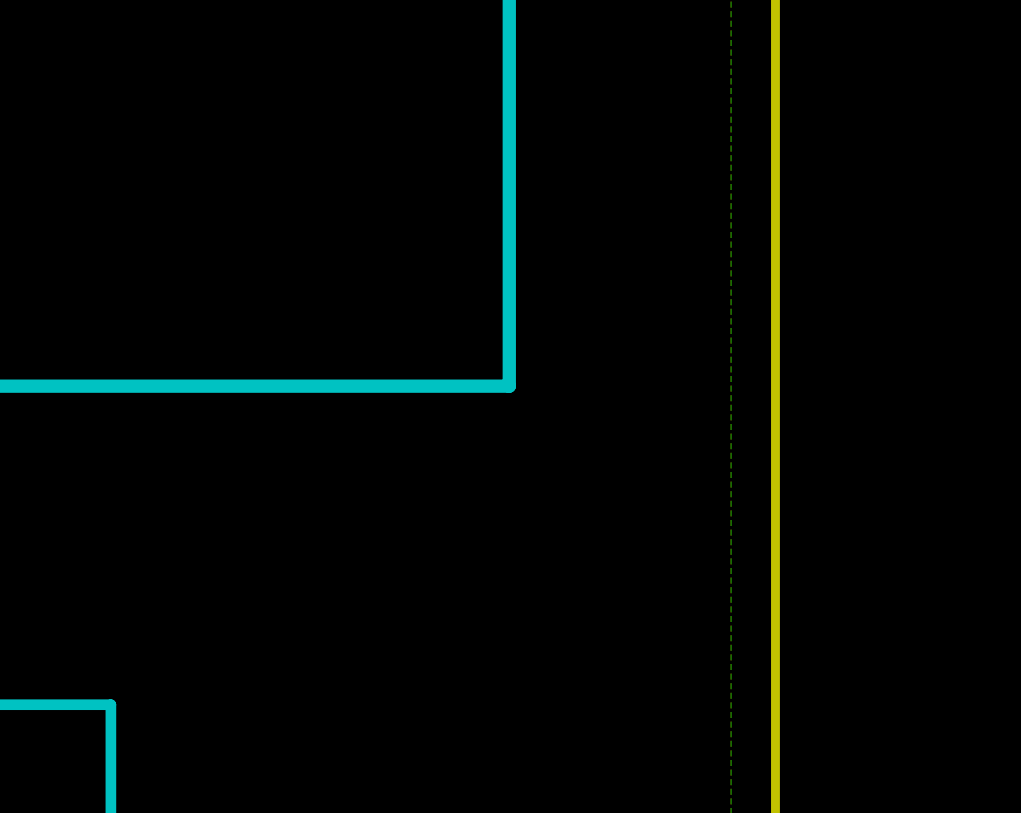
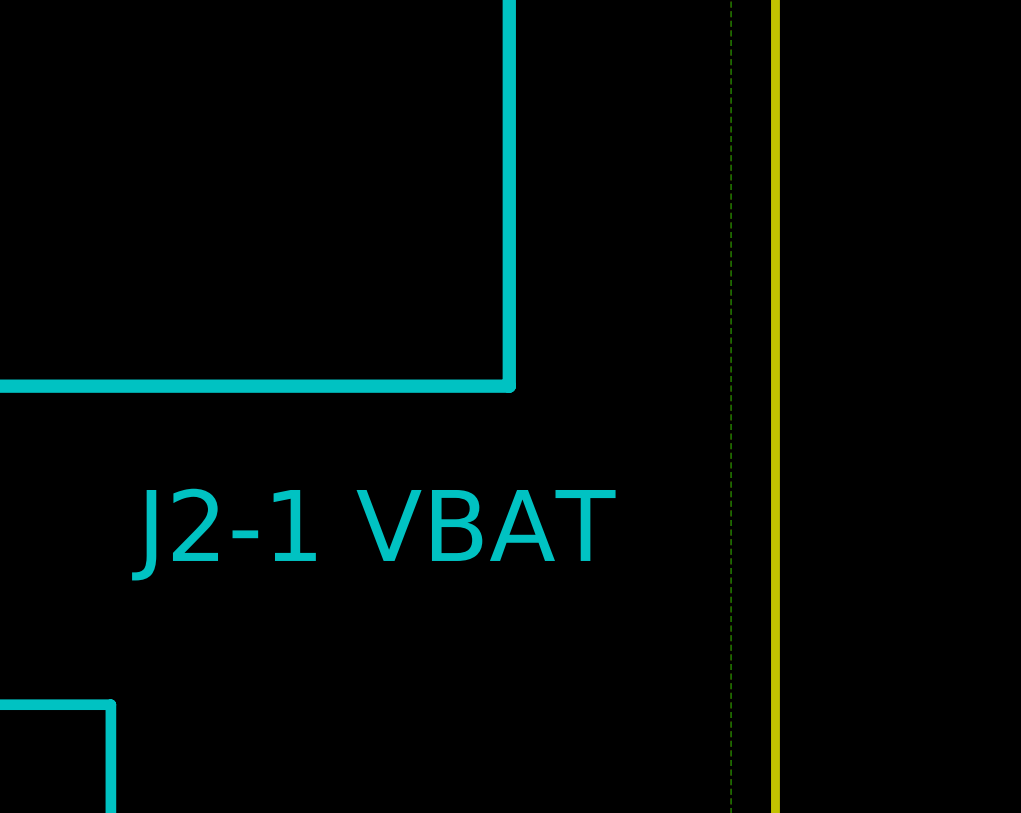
text: none -> J2-1 VBAT (373, 534)

